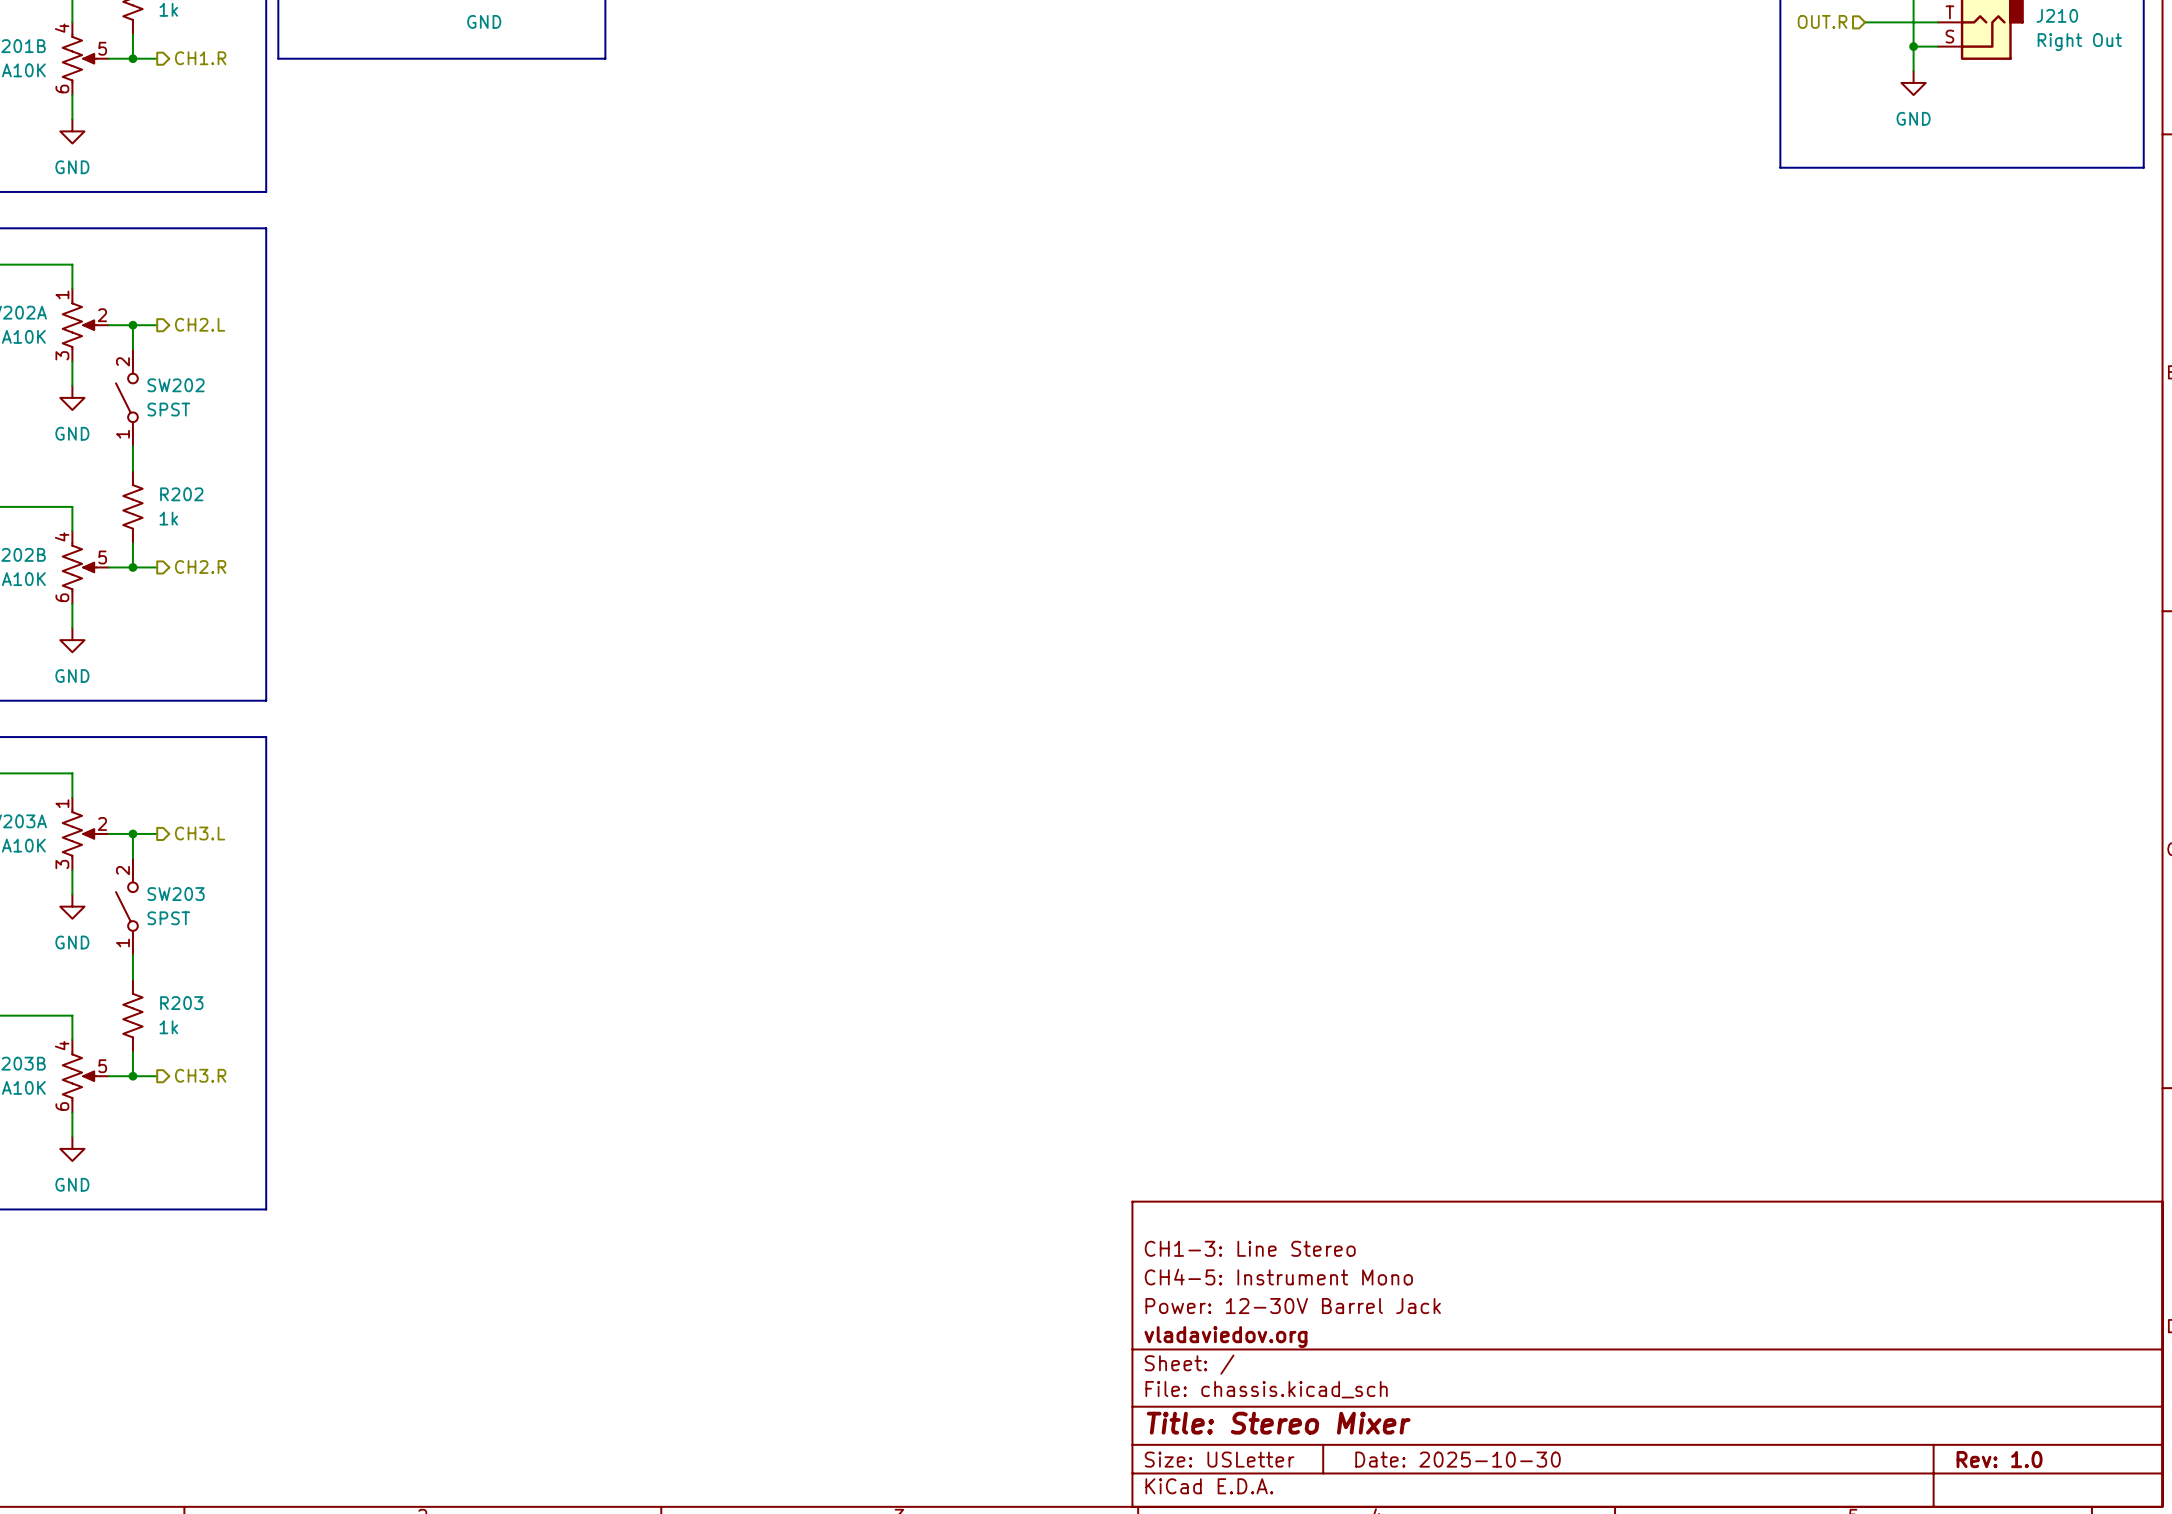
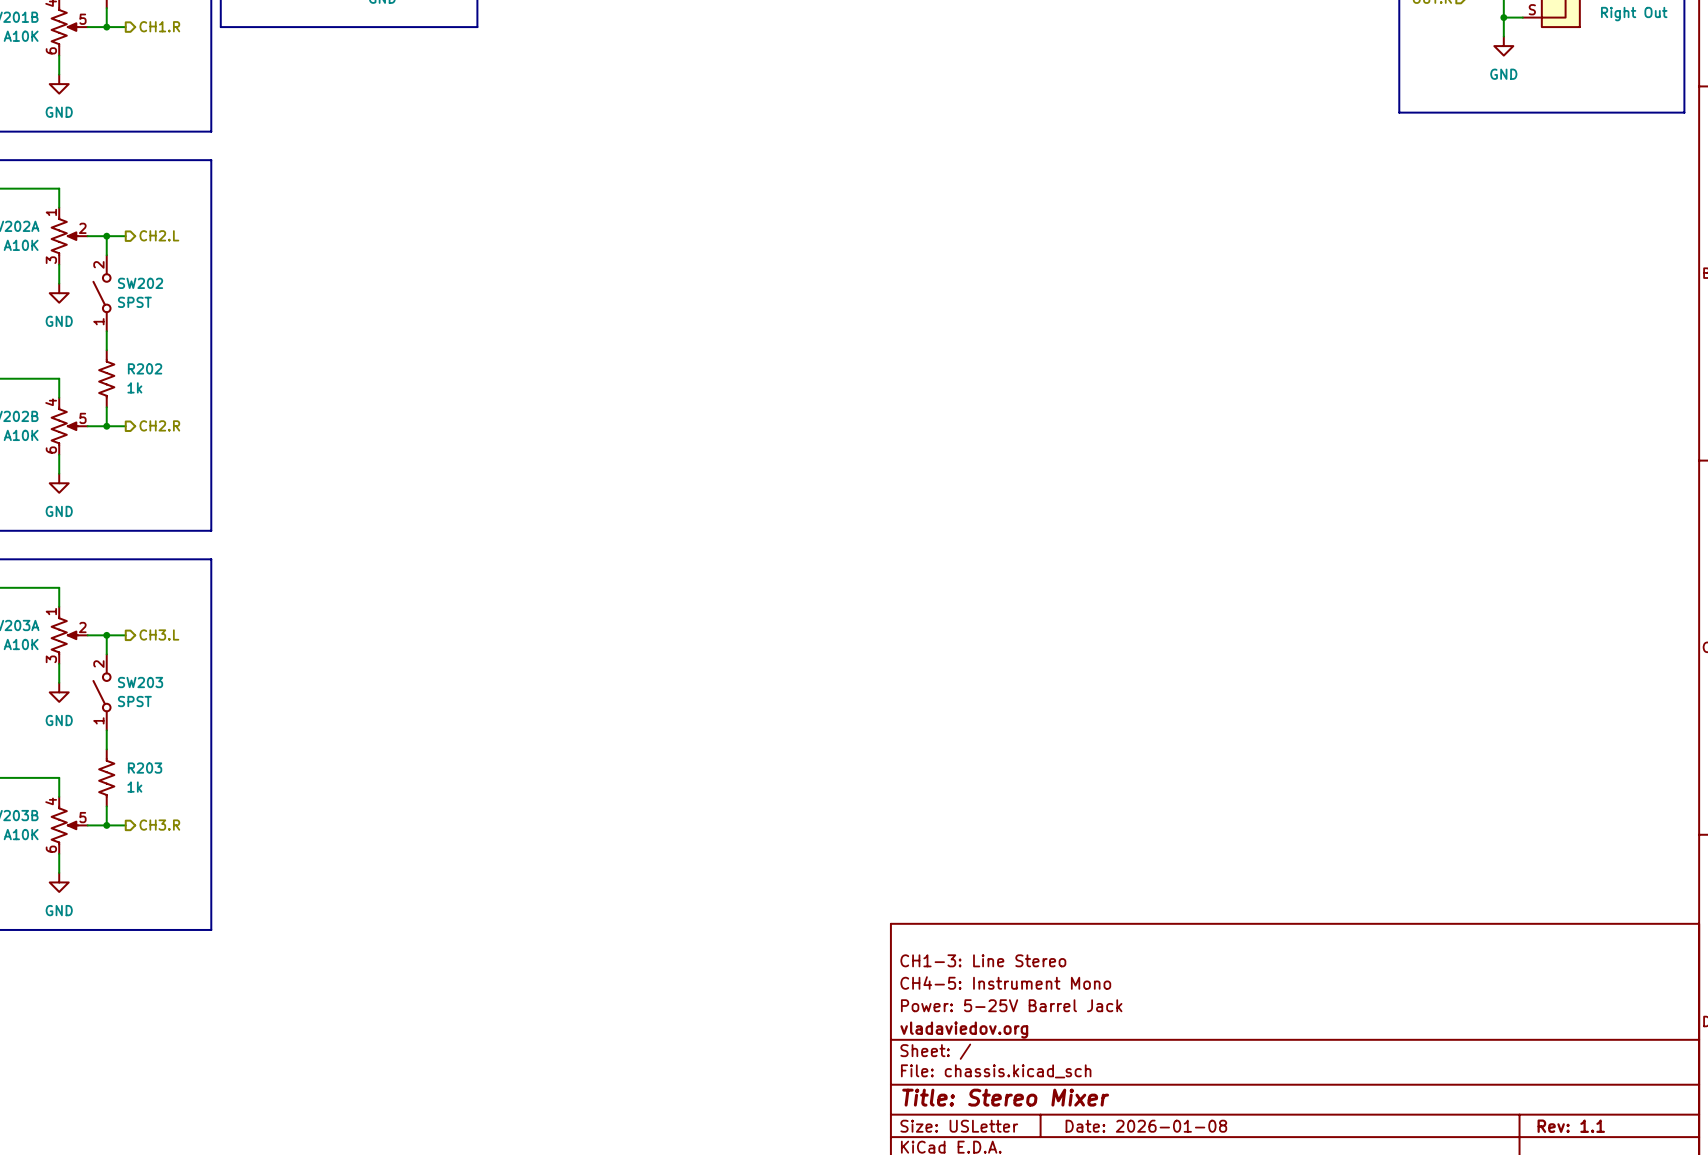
title block: Power: 12-30V Barrel Jack (1293, 1306) -> Power: 5-25V Barrel Jack (1011, 1005)
title block: Date: 2025-10-30 (1458, 1459) -> Date: 2026-01-08 (1146, 1126)
title block: Rev: 1.0 (1999, 1459) -> Rev: 1.1 (1571, 1126)

